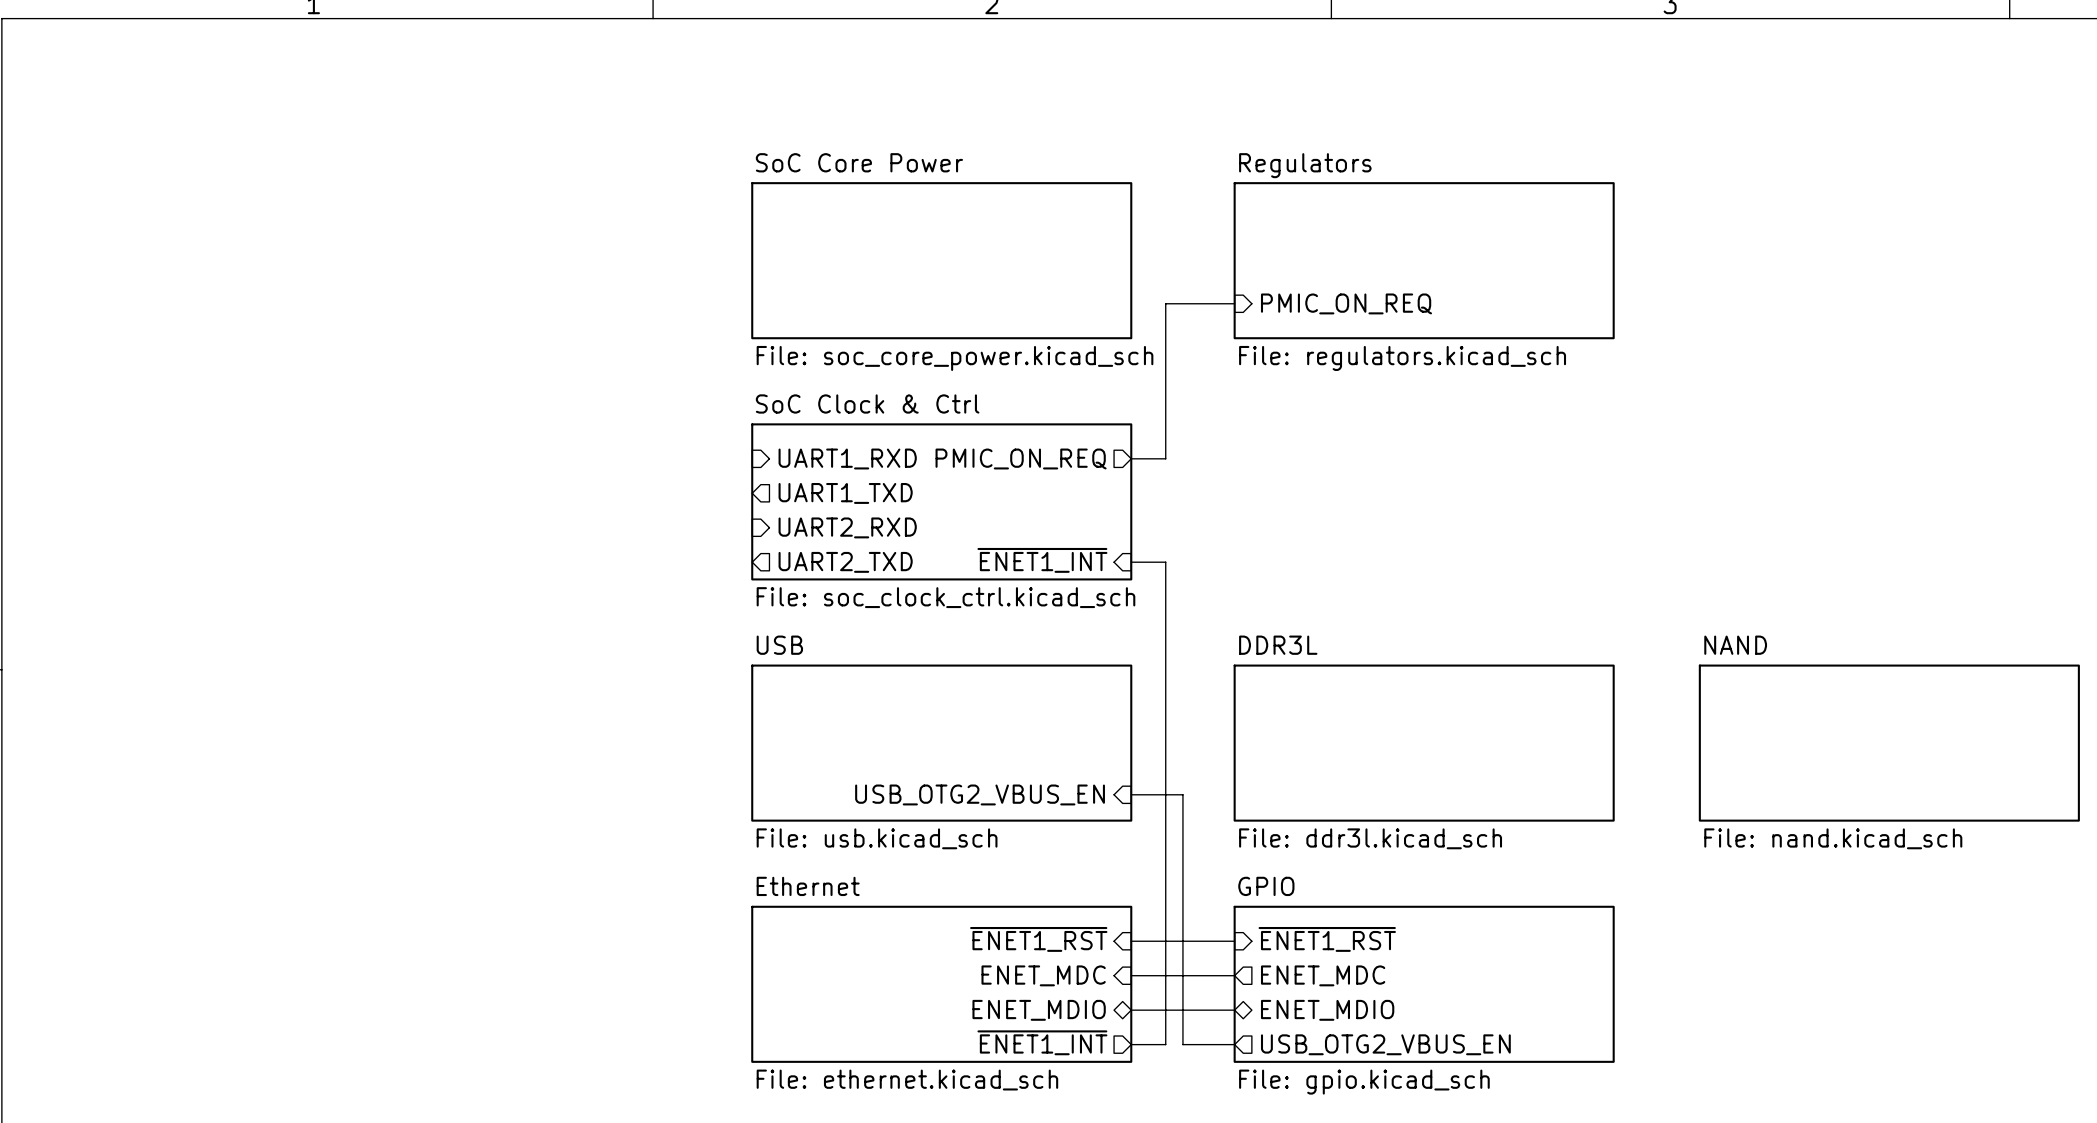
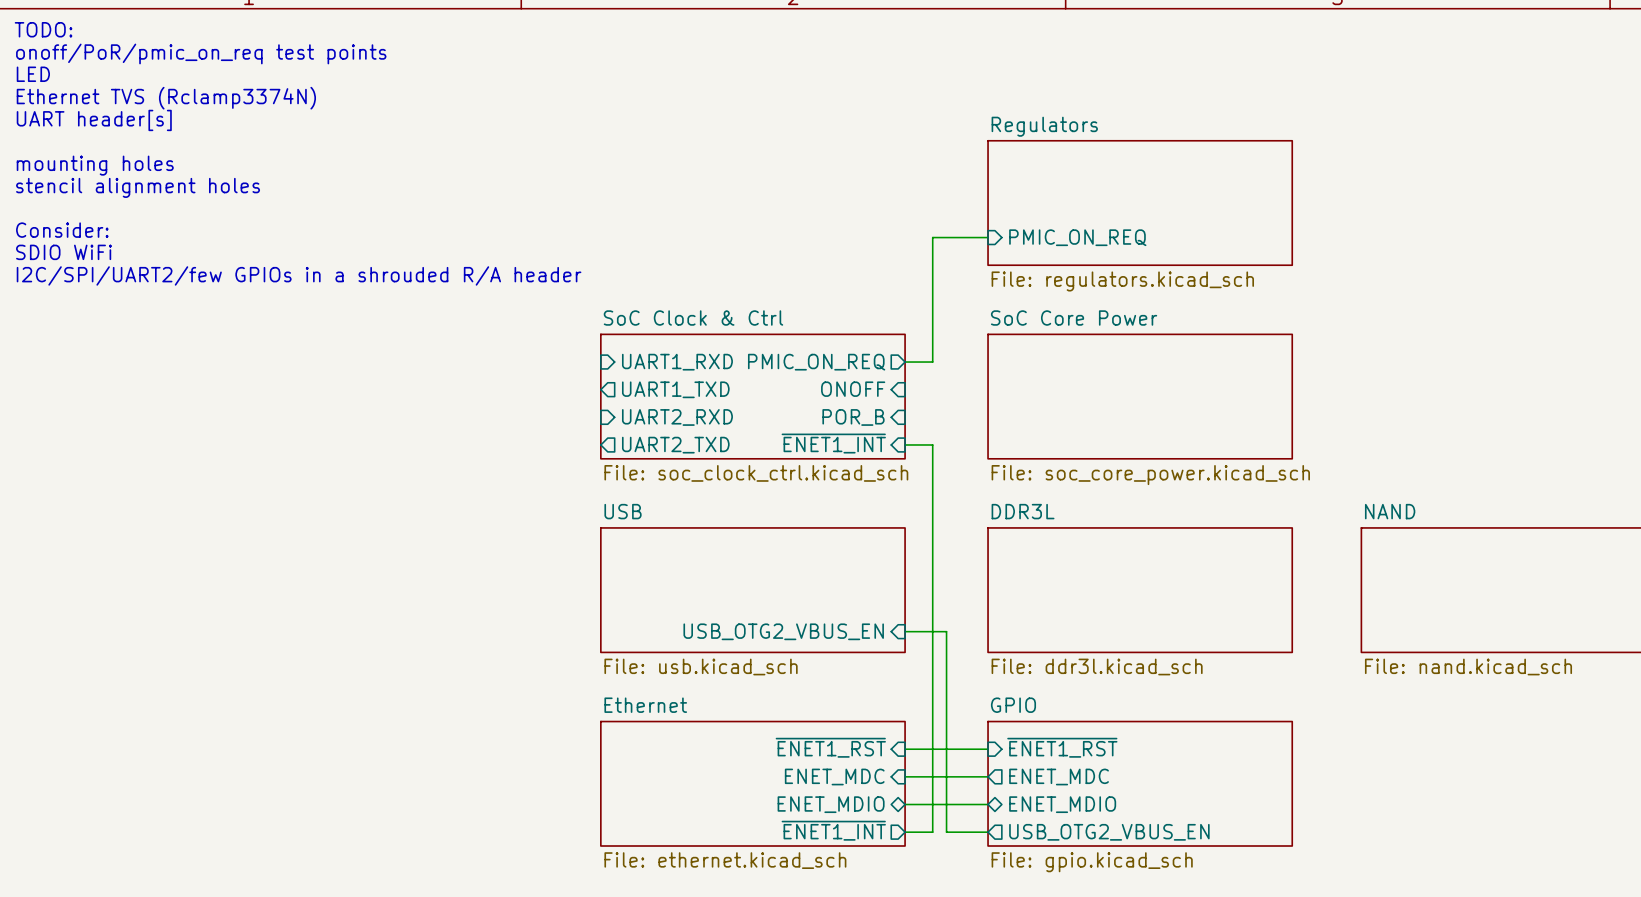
text: none -> TODO: (43, 29)
text: none -> onoff/PoR/pmic_on_req test points (201, 53)
text: none -> LED (33, 74)
text: none -> Ethernet TVS (Rclamp3374N) (166, 98)
text: none -> UART header[s] (94, 120)
text: none -> mounting holes (95, 165)
text: none -> stencil alignment holes (138, 187)
sheet SoC Core Power: File: soc_core_power.kicad_sch (941, 260) -> none
text: none -> Consider: (62, 230)
text: none -> SDIO WiFi (63, 252)
text: none -> I2C/SPI/UART2/few GPIOs in a shrouded R/A header (299, 275)
sheet pin: none -> ONOFF (853, 389)
sheet SoC Core Power: none -> File: soc_core_power.kicad_sch (1140, 396)
sheet pin: none -> POR_B (853, 417)

